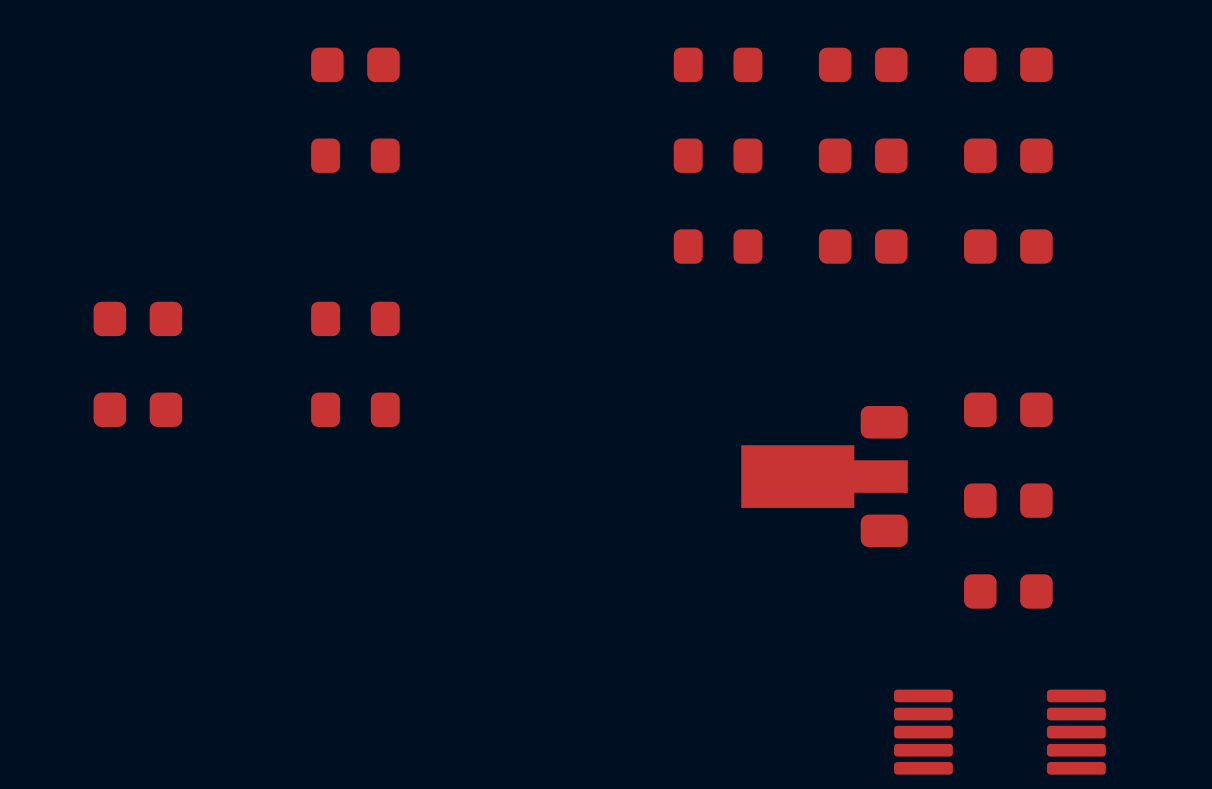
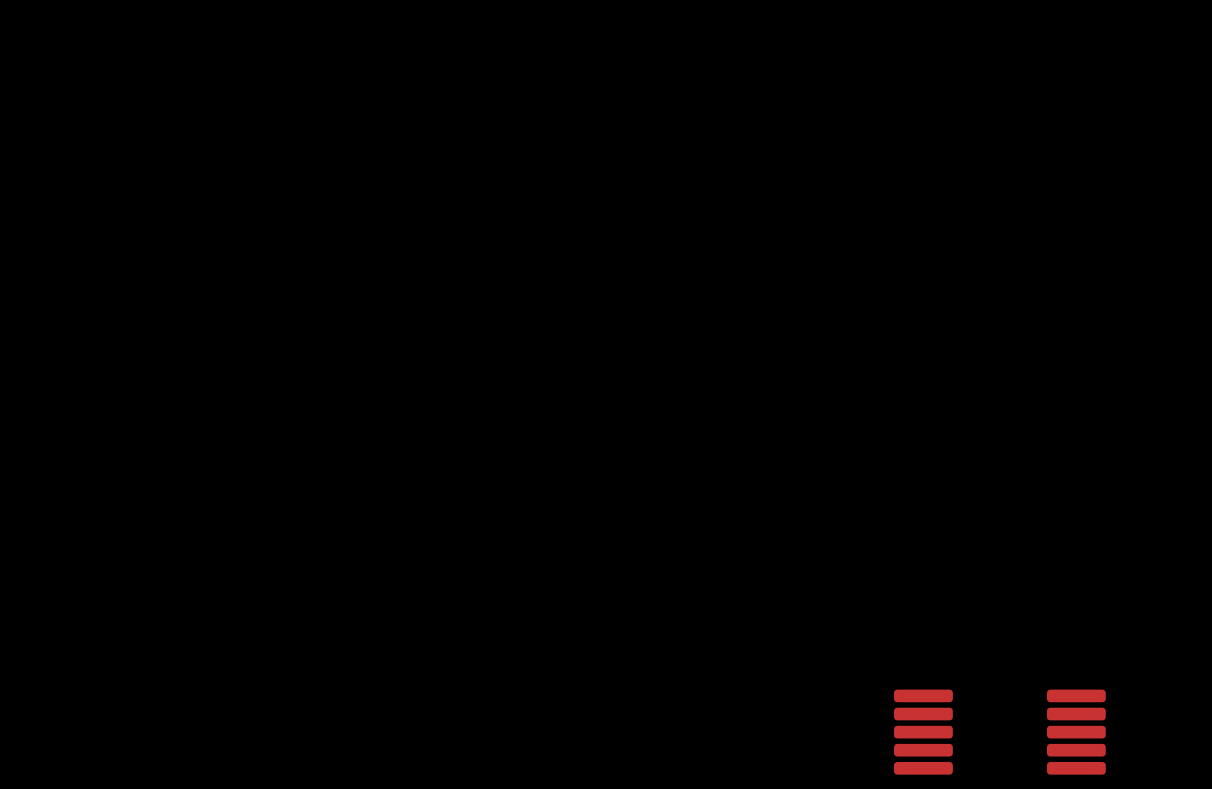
part: (355, 64) -> none
part: (718, 64) -> none
part: (863, 64) -> none
part: (1008, 64) -> none
part: (355, 155) -> none
part: (718, 155) -> none
part: (863, 155) -> none
part: (1008, 155) -> none
part: (718, 246) -> none
part: (863, 246) -> none
part: (1008, 246) -> none
part: (137, 318) -> none
part: (355, 318) -> none
part: (137, 409) -> none
part: (355, 409) -> none
part: (1008, 409) -> none
part: (824, 476) -> none
part: (1008, 500) -> none
part: (1008, 591) -> none

